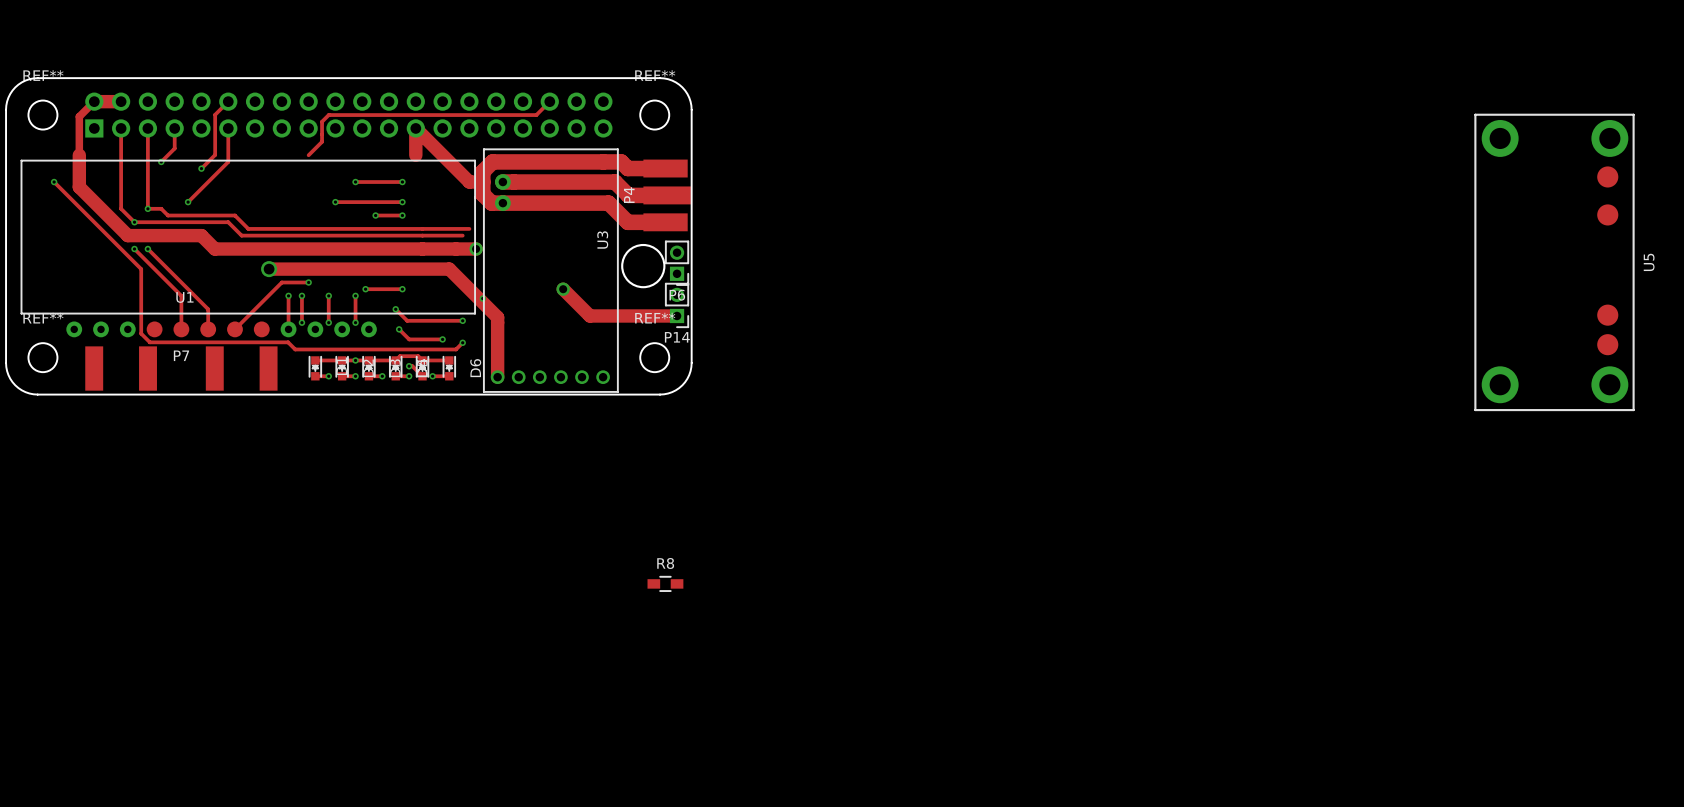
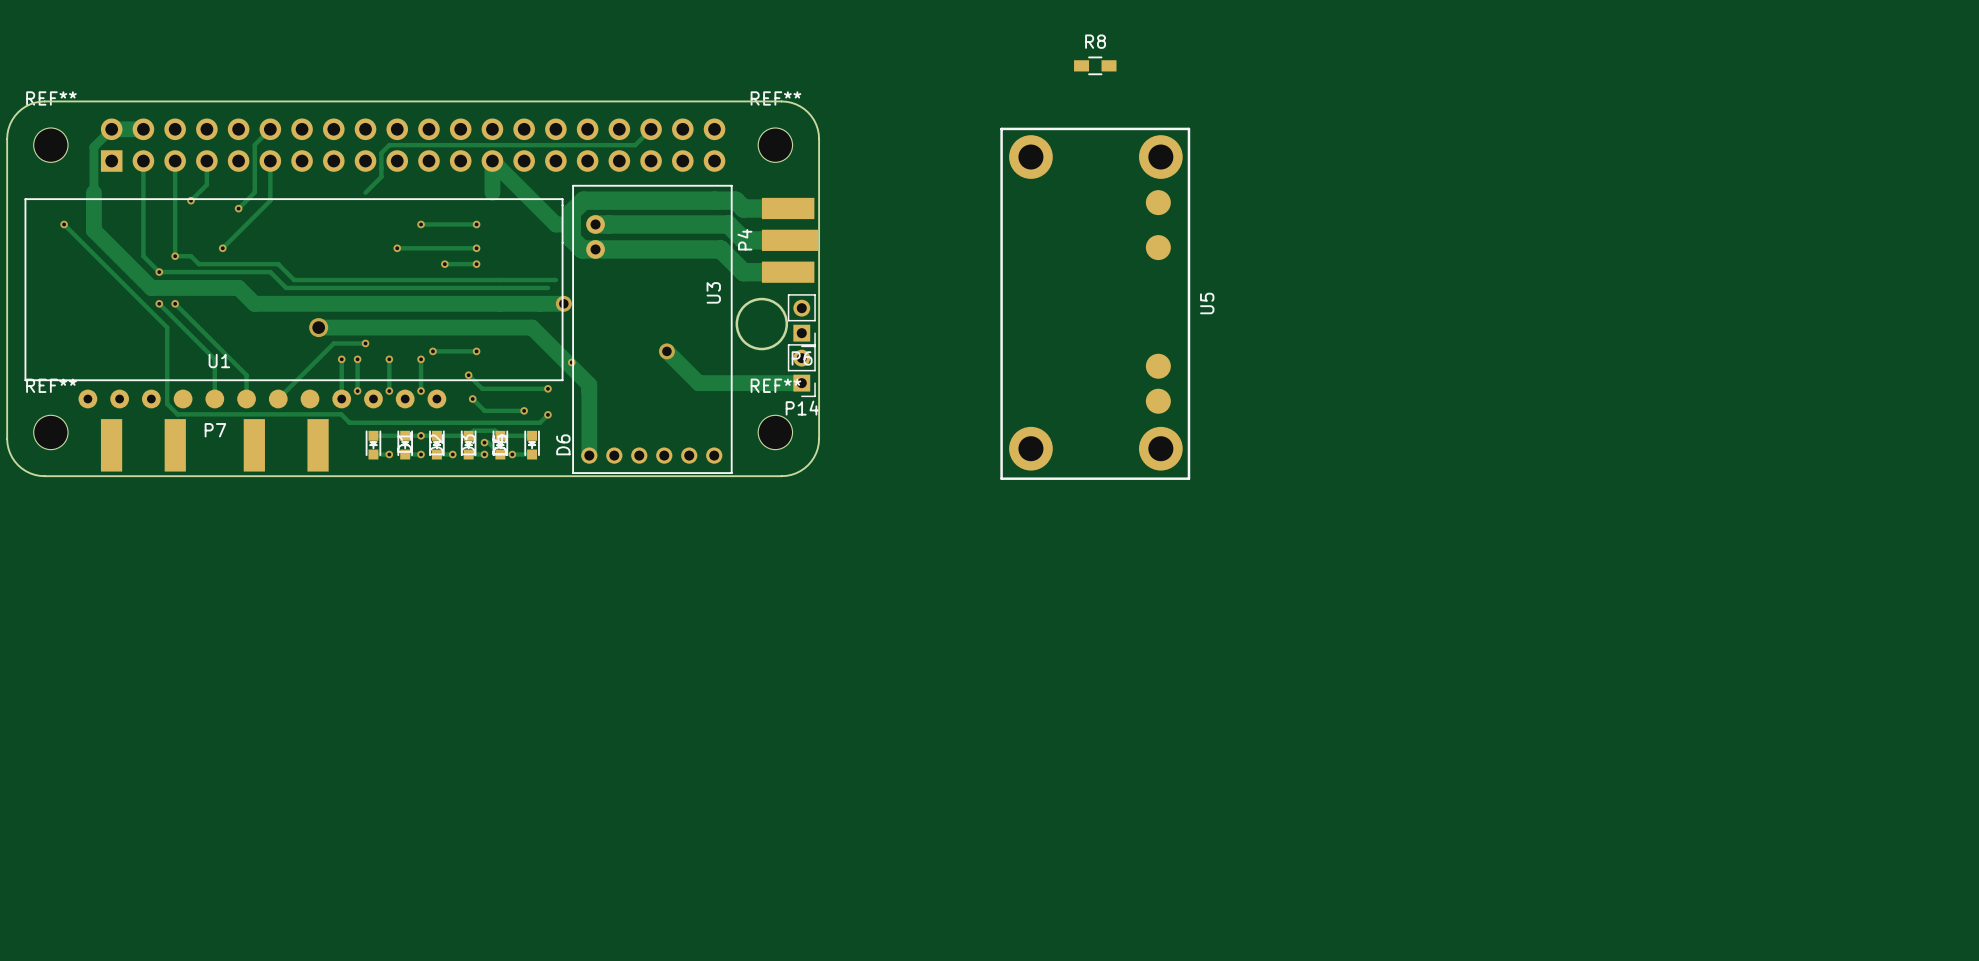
U5 position: (1554, 262) -> (1095, 303)
R8 position: (665, 583) -> (1095, 65)

